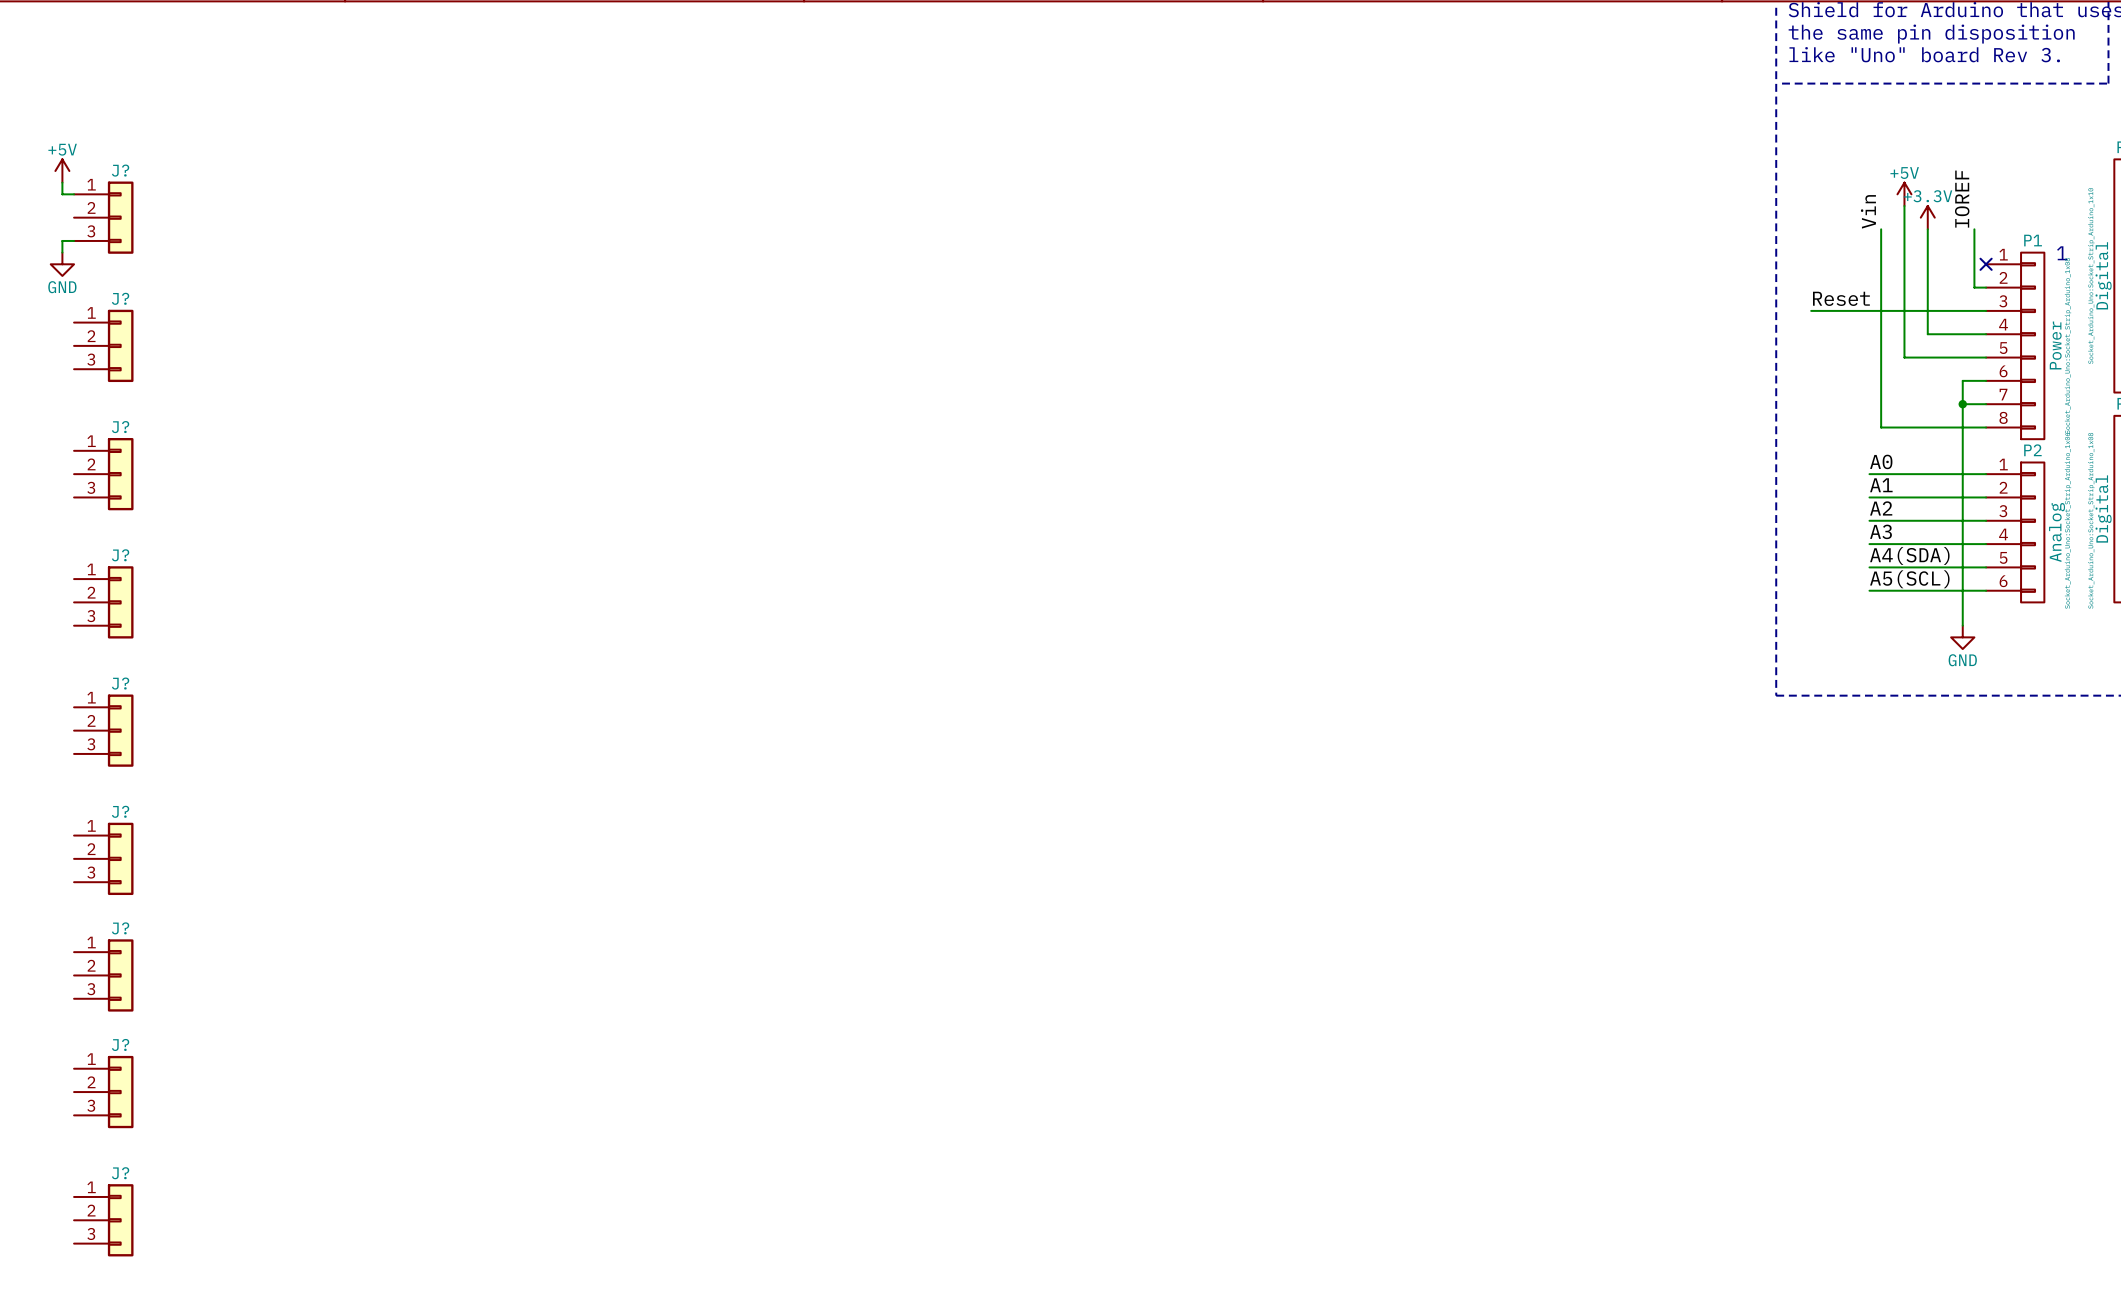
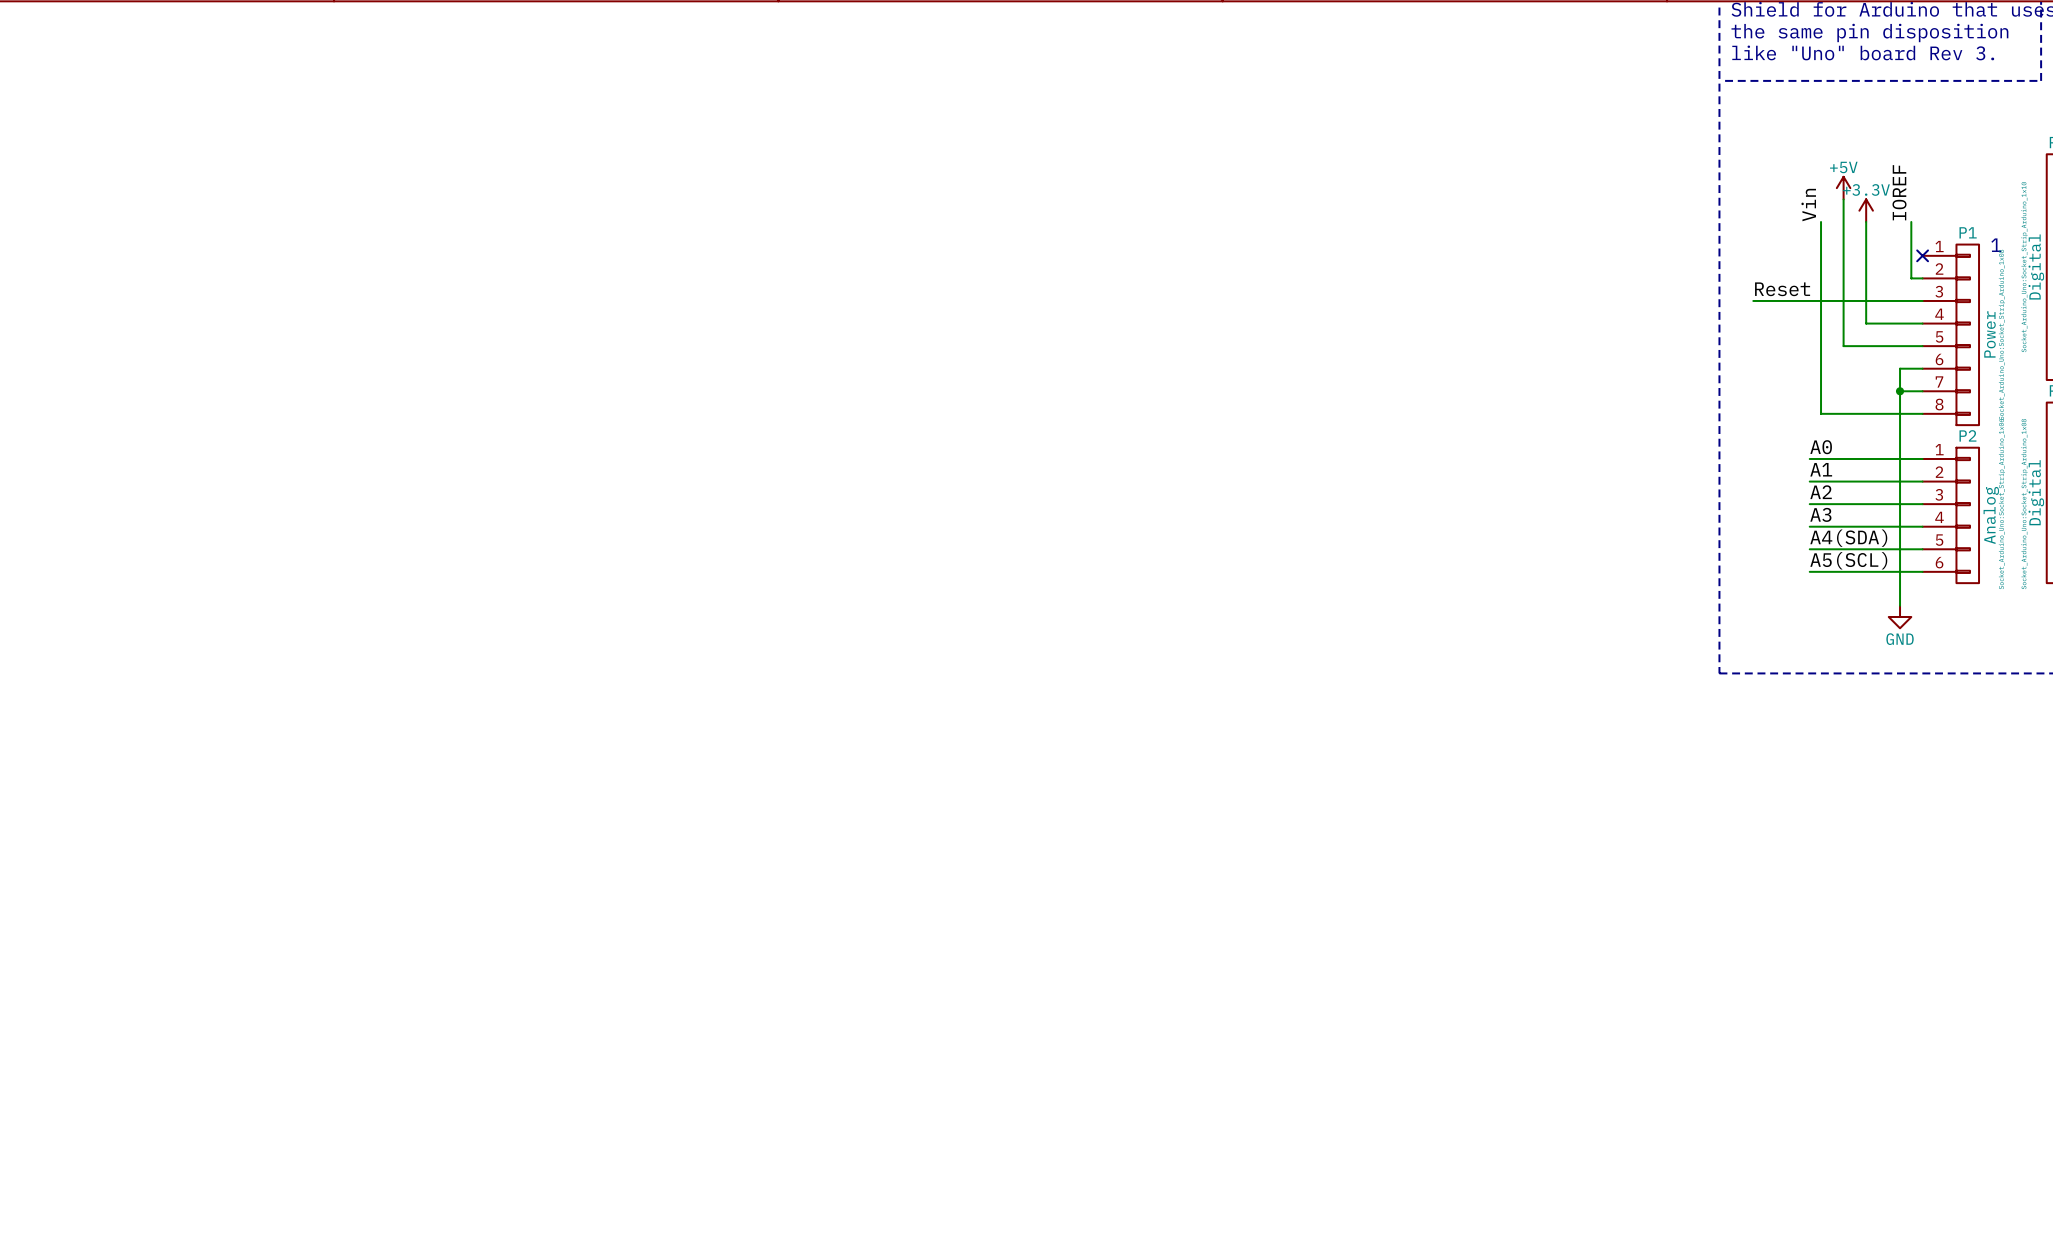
power symbol: +5V (62, 171) -> none
wire: (62, 182) (62, 194) (74, 194) -> none
J?: (103, 217) -> none
wire: (74, 240) (62, 240) (62, 252) -> none
power symbol: GND (62, 264) -> none
J?: (103, 345) -> none
J?: (103, 474) -> none
J?: (103, 602) -> none
J?: (103, 730) -> none
J?: (103, 858) -> none
J?: (103, 975) -> none
J?: (103, 1092) -> none
J?: (103, 1220) -> none

